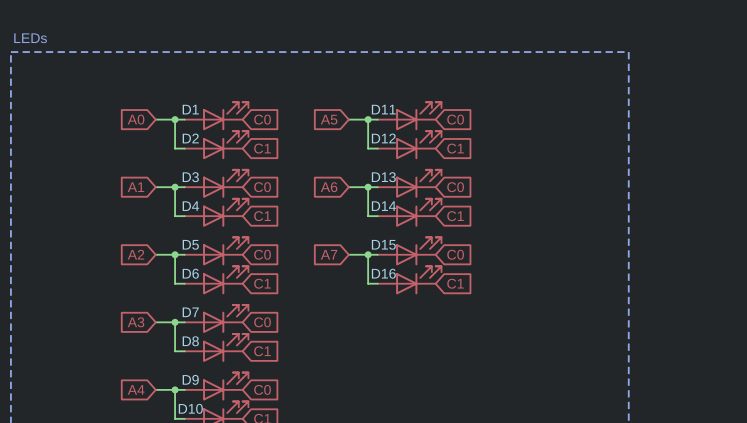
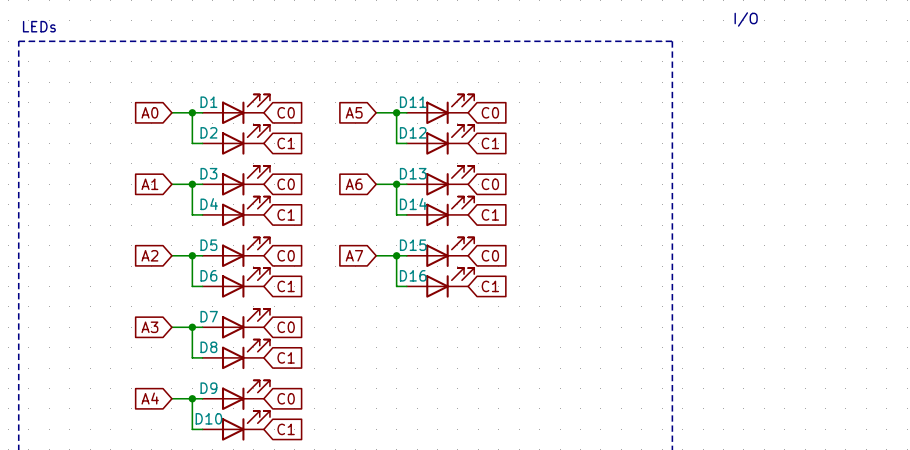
text: none -> I/O (746, 19)

